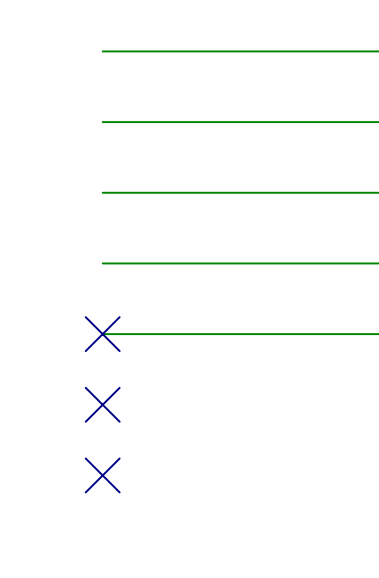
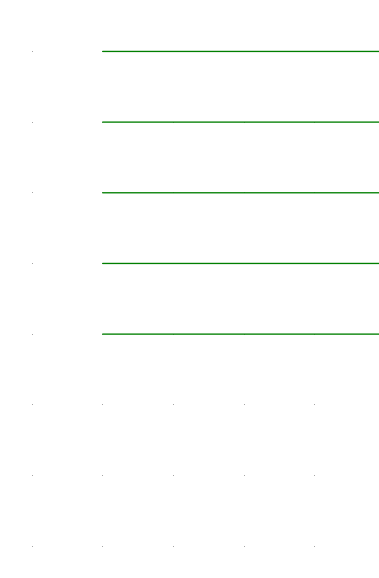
no-connect mark: (102, 334) -> none
no-connect mark: (102, 404) -> none
no-connect mark: (102, 475) -> none

